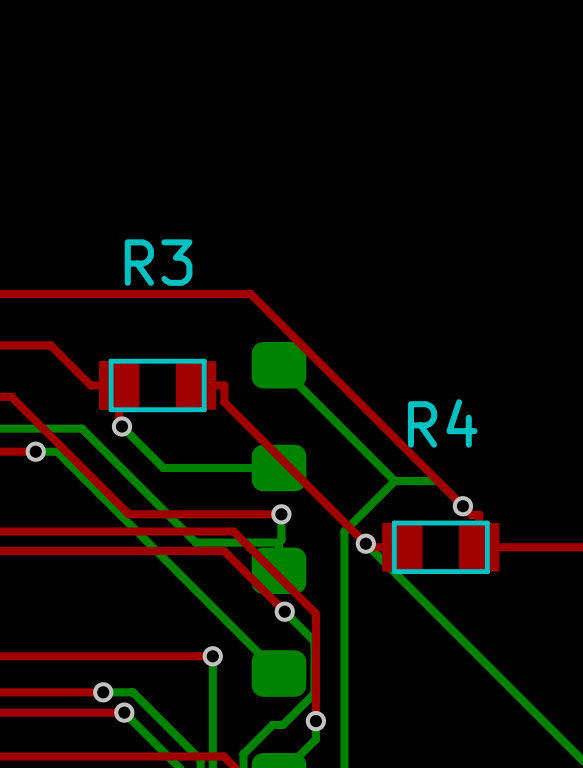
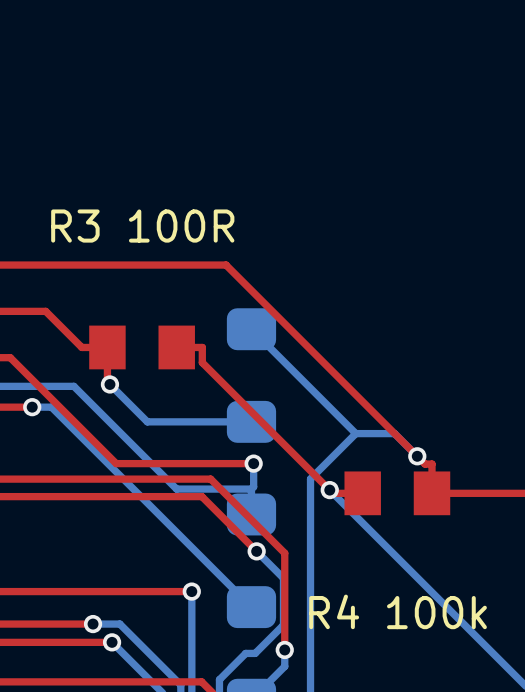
text: none -> R3 100R (142, 226)
R3: (157, 385) -> none
part: none -> (142, 347)
R4: (440, 547) -> none
part: none -> (397, 493)
text: none -> R4 100k (398, 611)

